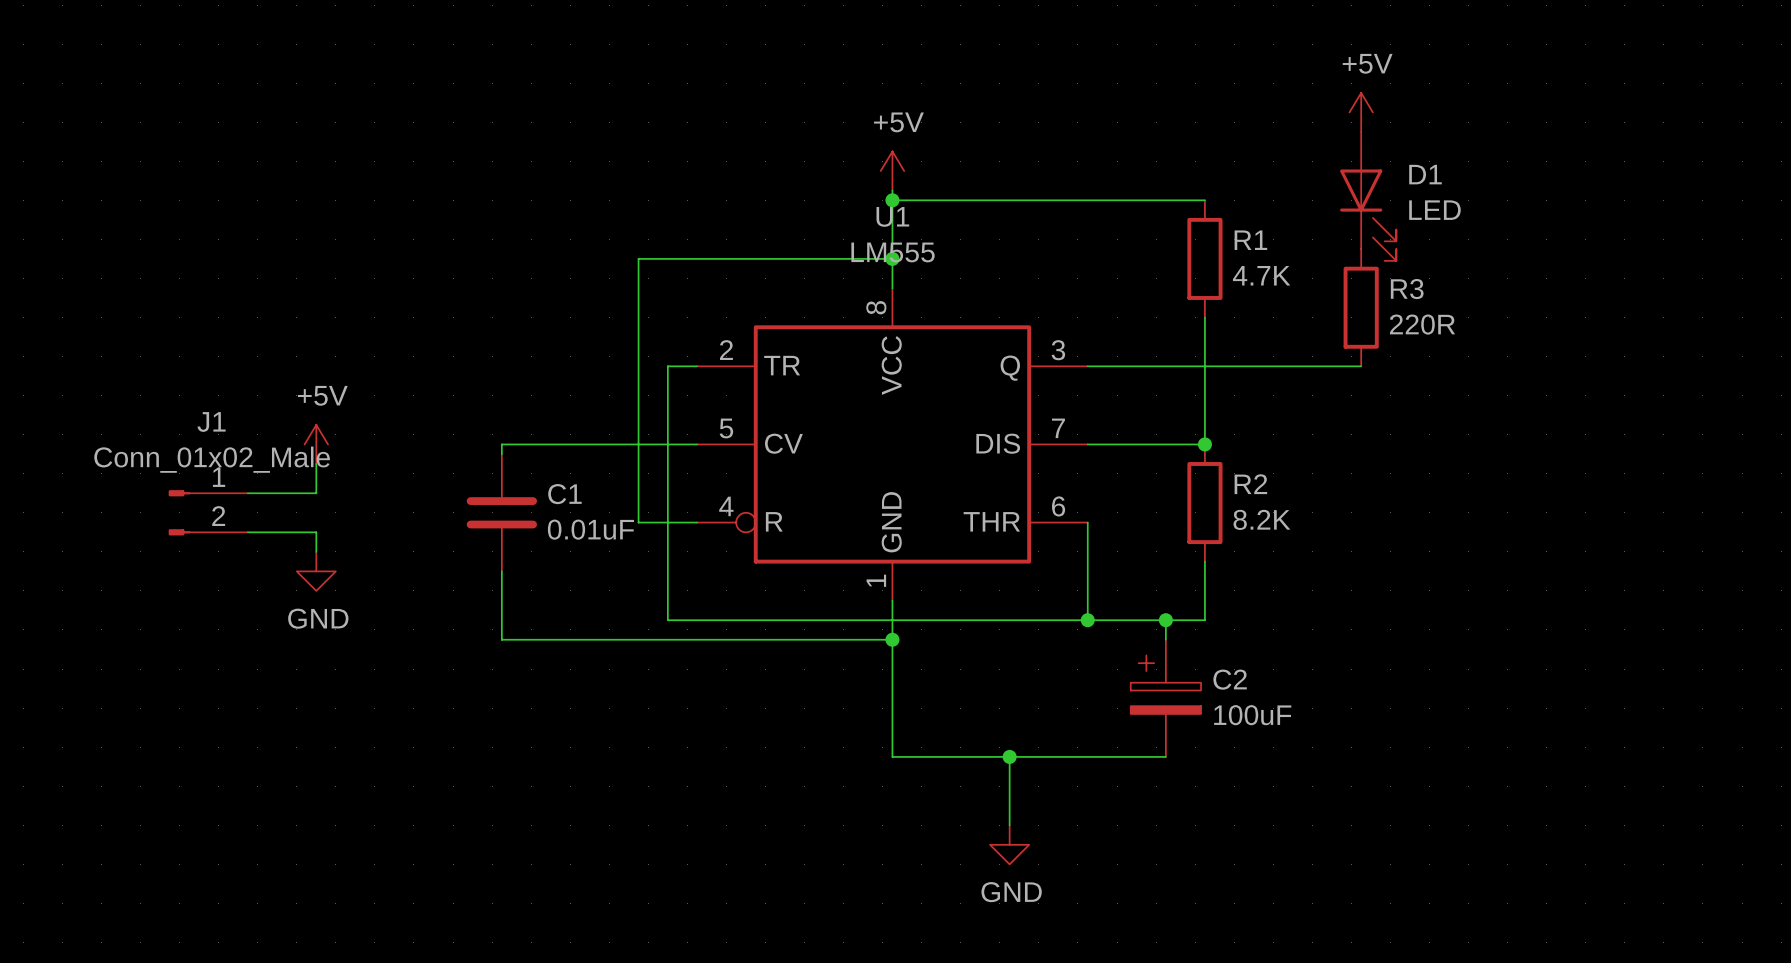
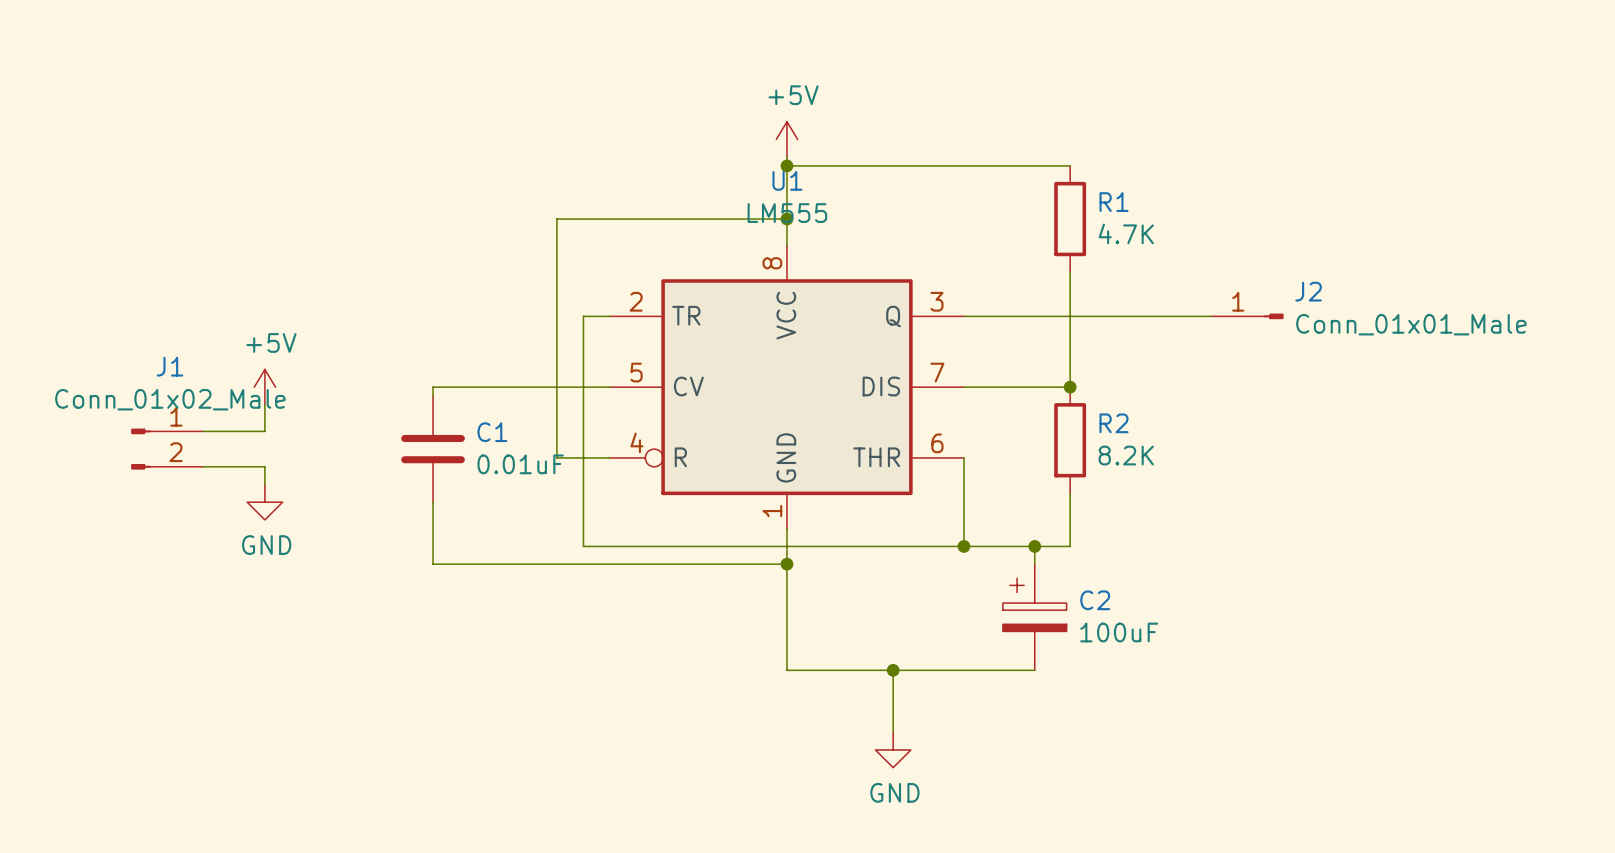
power symbol: +5V (1361, 112) -> none
D1: LED (1368, 196) -> none
R3: 220R (1361, 307) -> none
J2: none -> Conn_01x01_Male (1247, 316)

